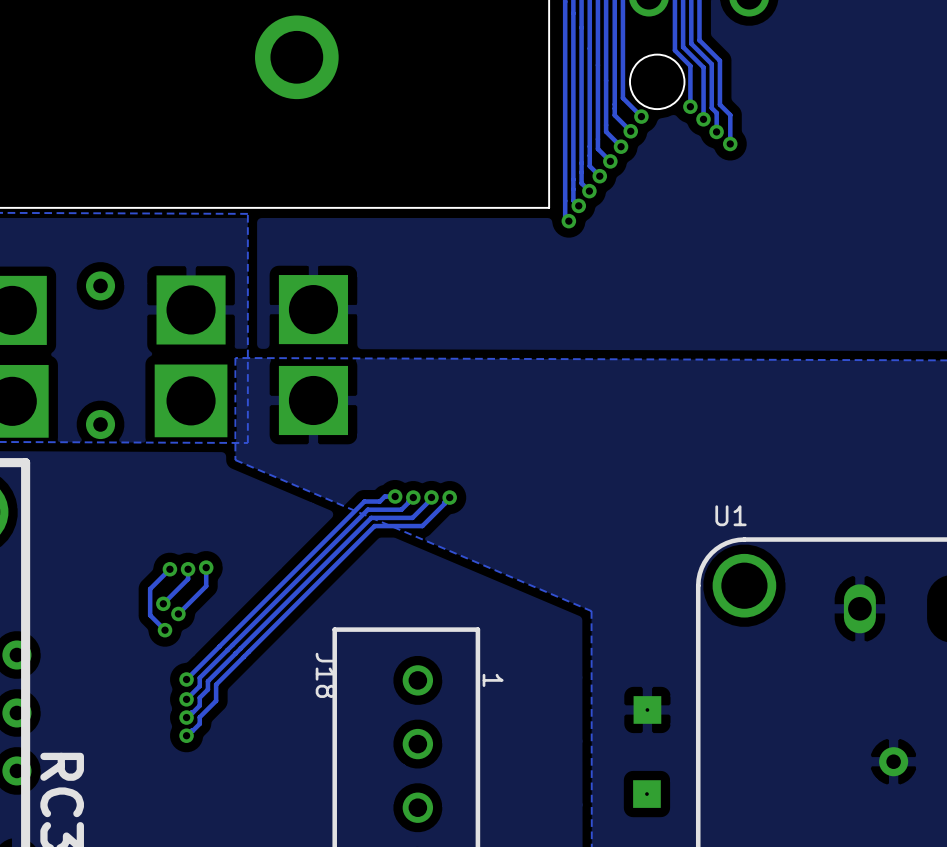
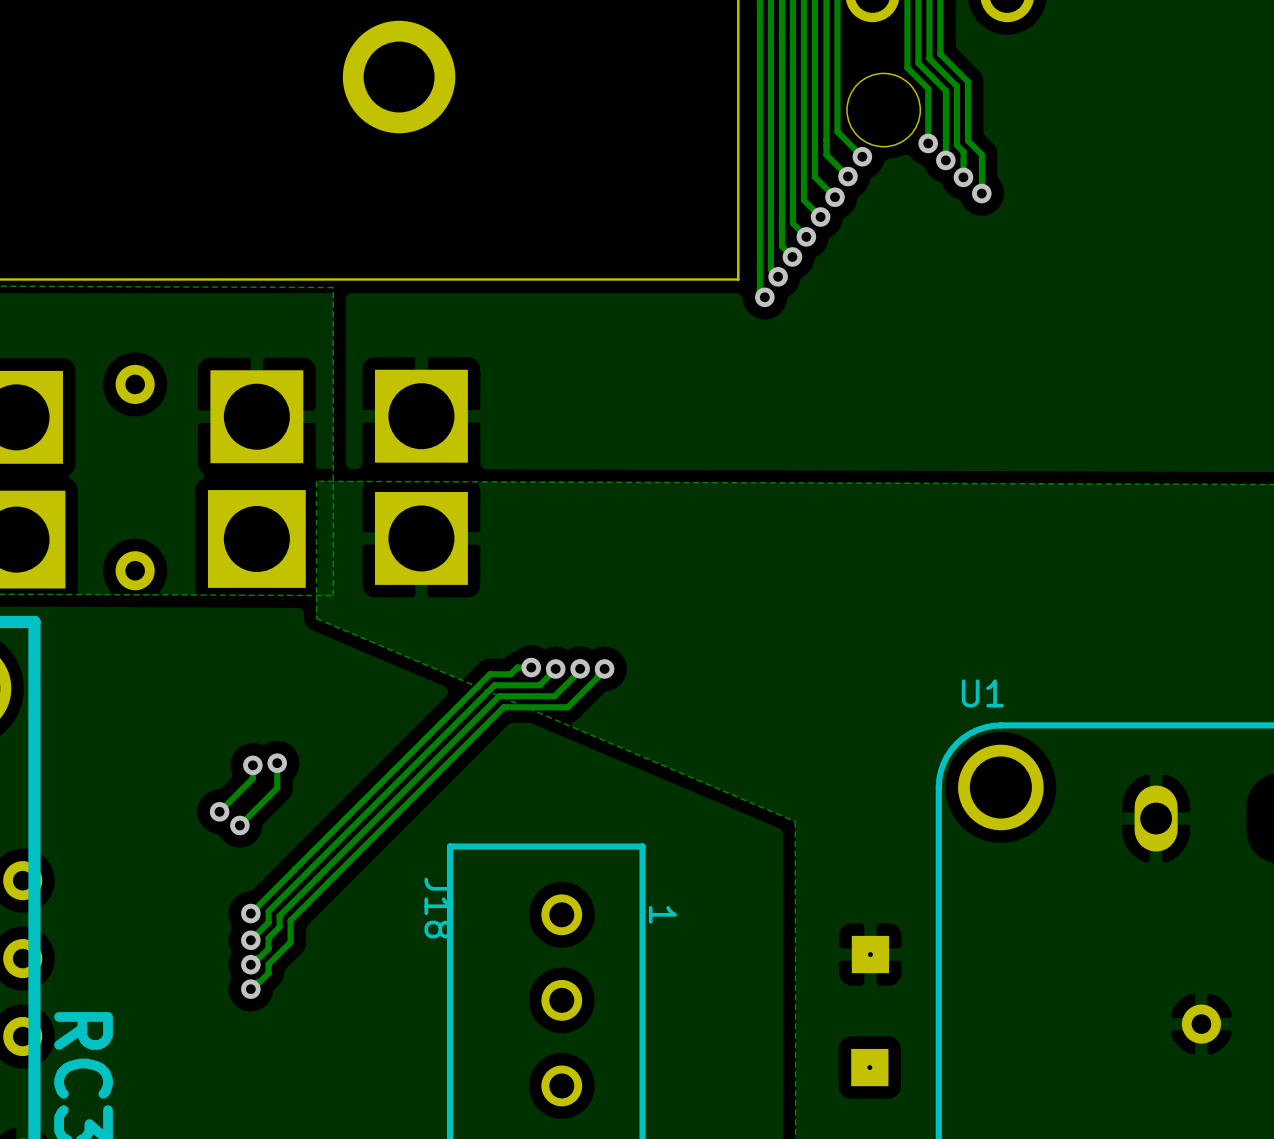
track: (169, 569) (150, 589) (150, 615) (165, 630) -> none
via: (169, 569) -> none
via: (165, 630) -> none

